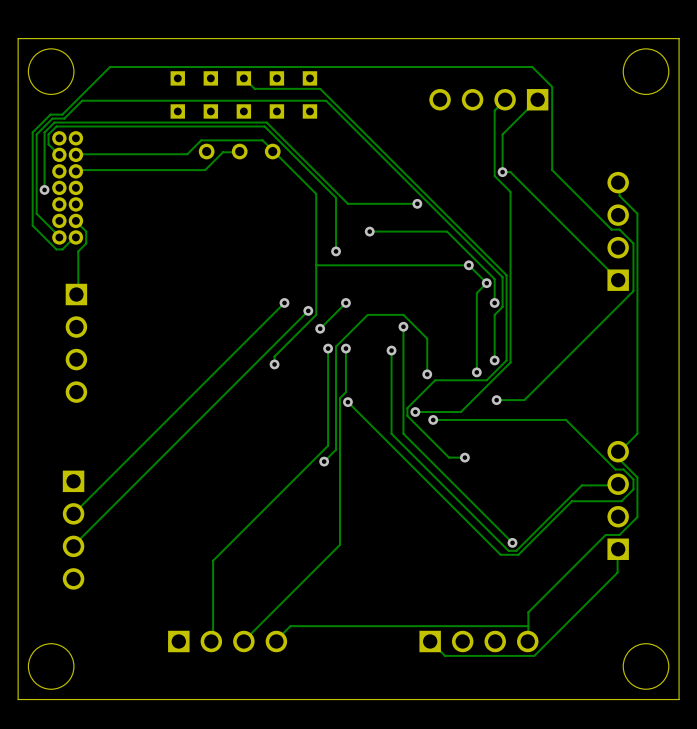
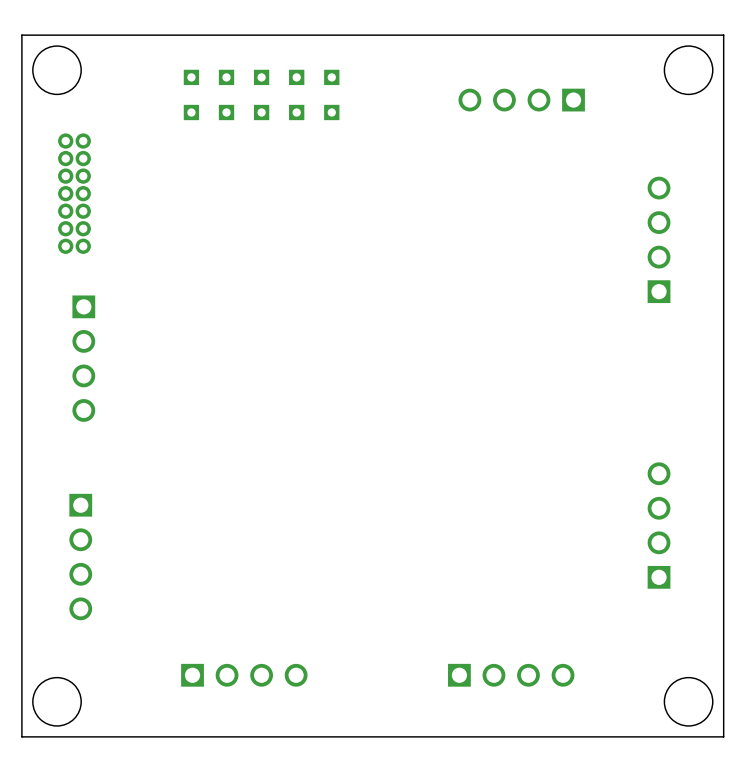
track: (243, 78) (254, 88) (320, 88) (506, 275) (506, 360) (486, 380) (435, 380) (407, 408) (407, 415) (449, 457) (464, 457) -> none
track: (505, 99) (494, 110) (494, 176) (510, 191) (510, 362) (460, 412) (415, 412) -> none
track: (537, 99) (502, 134) (502, 172) (510, 172) (618, 280) -> none
track: (239, 151) (223, 152) (205, 170) (75, 171) -> none
part: (239, 151) -> none
track: (59, 154) (48, 144) (48, 134) (56, 126) (264, 126) (336, 197) (336, 251) -> none
track: (75, 154) (187, 154) (201, 140) (262, 140) (316, 193) (316, 314) (274, 356) (274, 364) -> none
via: (502, 172) -> none
track: (618, 182) (619, 195) (637, 213) (637, 433) (619, 451) -> none
track: (44, 189) (44, 132) (54, 122) (266, 122) (347, 203) (417, 203) -> none
via: (44, 189) -> none
via: (417, 203) -> none
track: (75, 220) (86, 231) (86, 243) (78, 251) (78, 293) (76, 294) -> none
track: (369, 231) (447, 231) (494, 279) (494, 302) -> none
via: (369, 231) -> none
track: (59, 237) (36, 213) (36, 134) (52, 118) (64, 118) (82, 100) (326, 100) (502, 277) (502, 306) (494, 314) (494, 360) -> none
track: (75, 237) (62, 249) (56, 249) (32, 225) (32, 132) (50, 114) (62, 114) (110, 67) (532, 67) (552, 86) (552, 170) (611, 229) (619, 229) (633, 243) (633, 291) (524, 400) (496, 400) -> none
via: (336, 251) -> none
track: (316, 265) (468, 265) (486, 283) (476, 293) (476, 372) -> none
via: (468, 265) -> none
via: (486, 283) -> none
track: (284, 302) (73, 513) -> none
via: (284, 302) -> none
track: (345, 302) (320, 328) -> none
via: (345, 302) -> none
via: (494, 302) -> none
track: (308, 310) (73, 546) -> none
via: (308, 310) -> none
track: (403, 326) (403, 433) (512, 542) -> none
via: (403, 326) -> none
via: (320, 328) -> none
track: (328, 348) (328, 445) (213, 560) (213, 640) (211, 641) -> none
via: (328, 348) -> none
track: (345, 348) (345, 392) (340, 398) (340, 544) (243, 641) -> none
via: (345, 348) -> none
track: (391, 350) (391, 433) (508, 550) (516, 550) (581, 485) (618, 484) -> none
via: (391, 350) -> none
via: (494, 360) -> none
via: (274, 364) -> none
via: (476, 372) -> none
track: (427, 374) (427, 338) (403, 314) (367, 314) (336, 346) (336, 449) (324, 461) -> none
via: (427, 374) -> none
via: (496, 400) -> none
track: (347, 402) (500, 554) (518, 554) (571, 501) (621, 501) (633, 489) (633, 479) (623, 469) (615, 469) (566, 419) (433, 419) -> none
via: (347, 402) -> none
via: (415, 412) -> none
via: (433, 419) -> none
track: (619, 451) (619, 459) (637, 477) (637, 517) (619, 534) (605, 534) (528, 612) (527, 641) -> none
via: (464, 457) -> none
via: (324, 461) -> none
via: (512, 542) -> none
track: (618, 549) (617, 572) (534, 655) (445, 655) (430, 641) -> none
track: (528, 626) (290, 626) (276, 641) -> none

